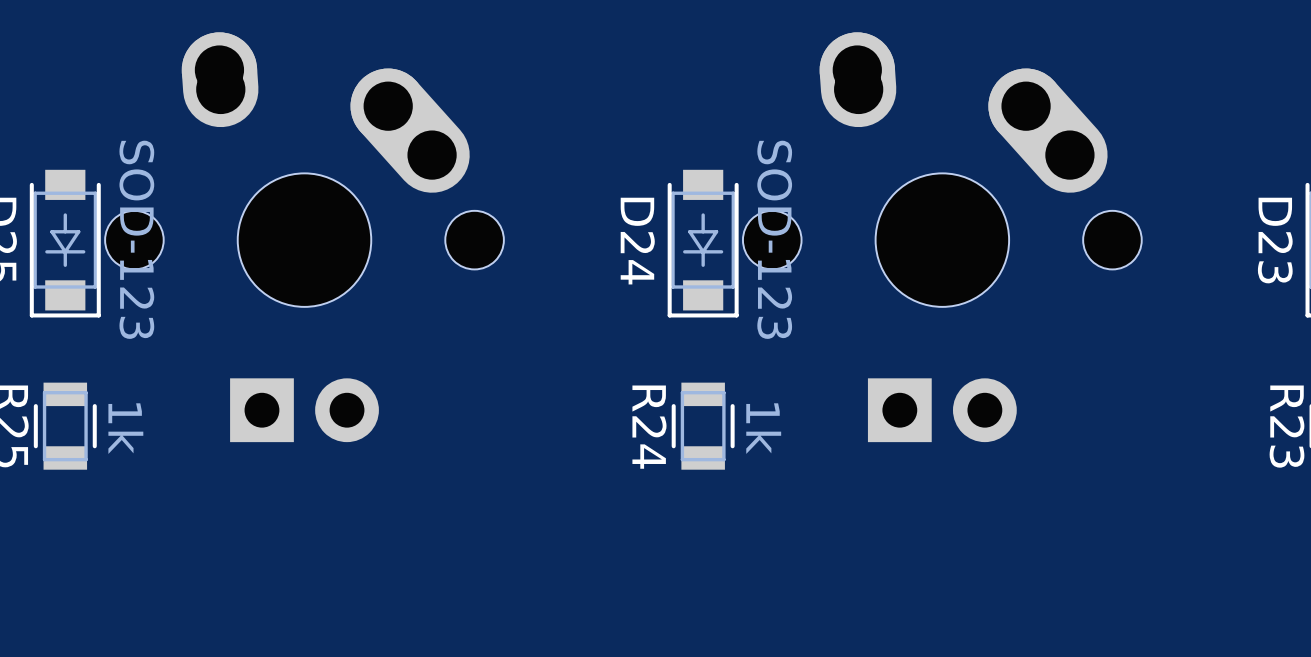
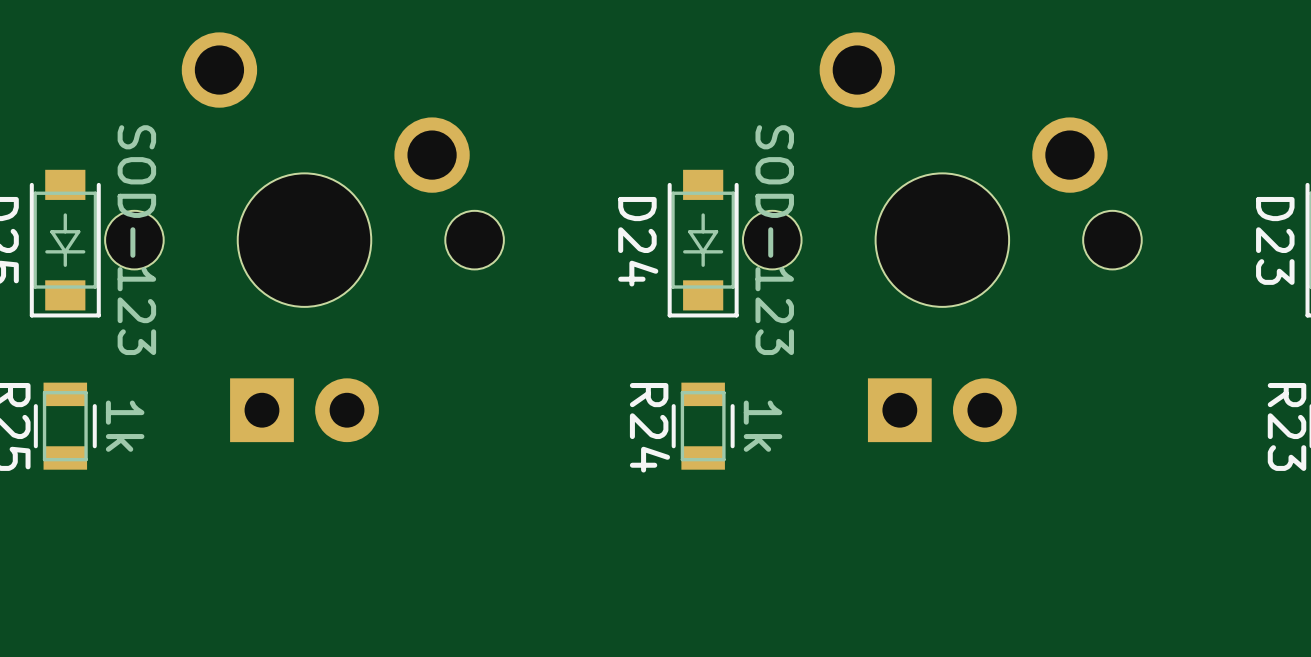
part footprint: [105, 32, 504, 443] -> [105, 32, 504, 443]
part footprint: [742, 32, 1142, 443] -> [742, 32, 1142, 443]

